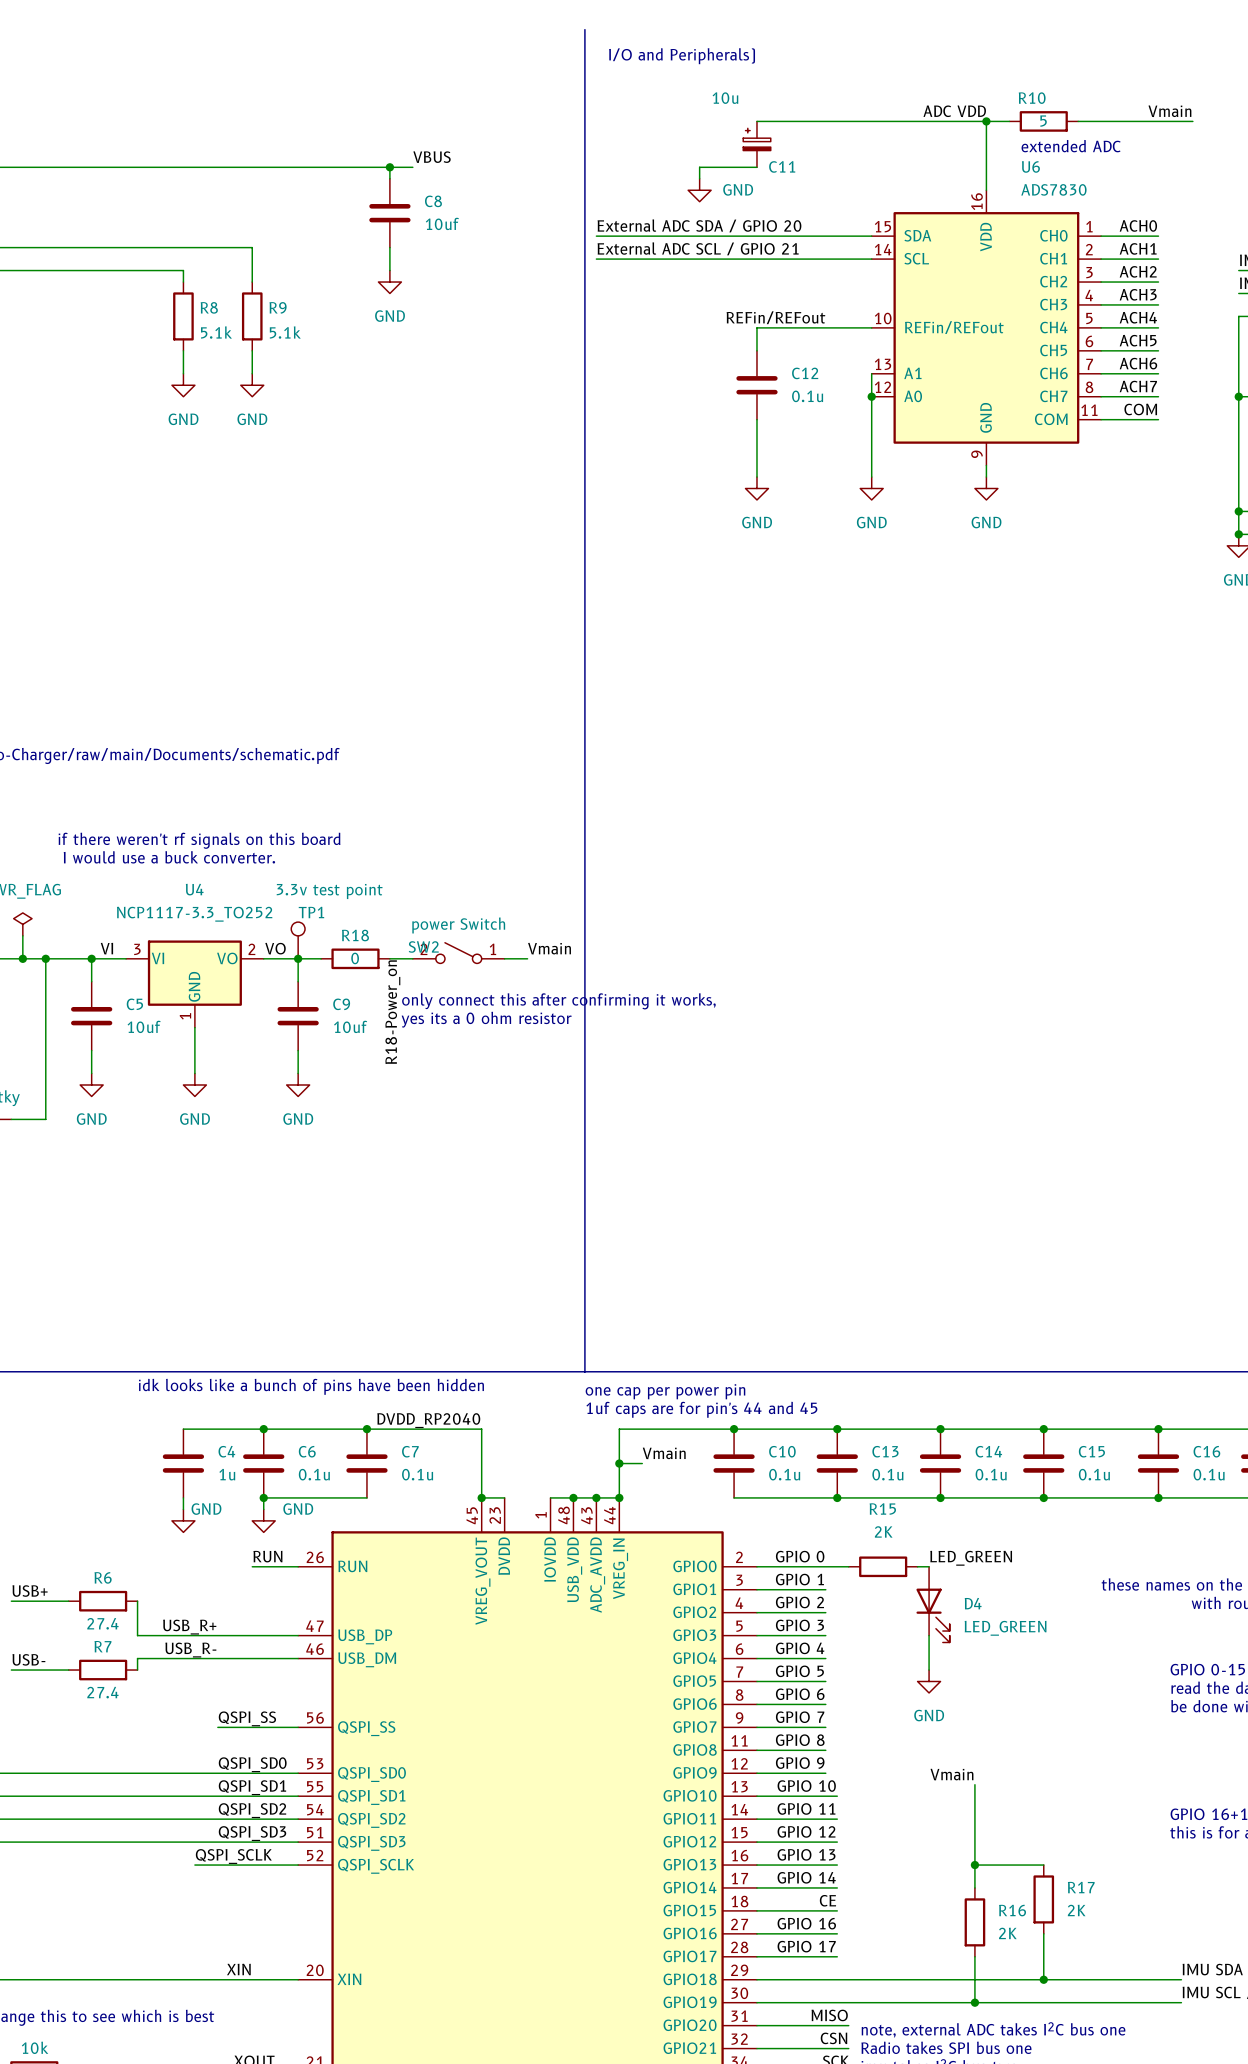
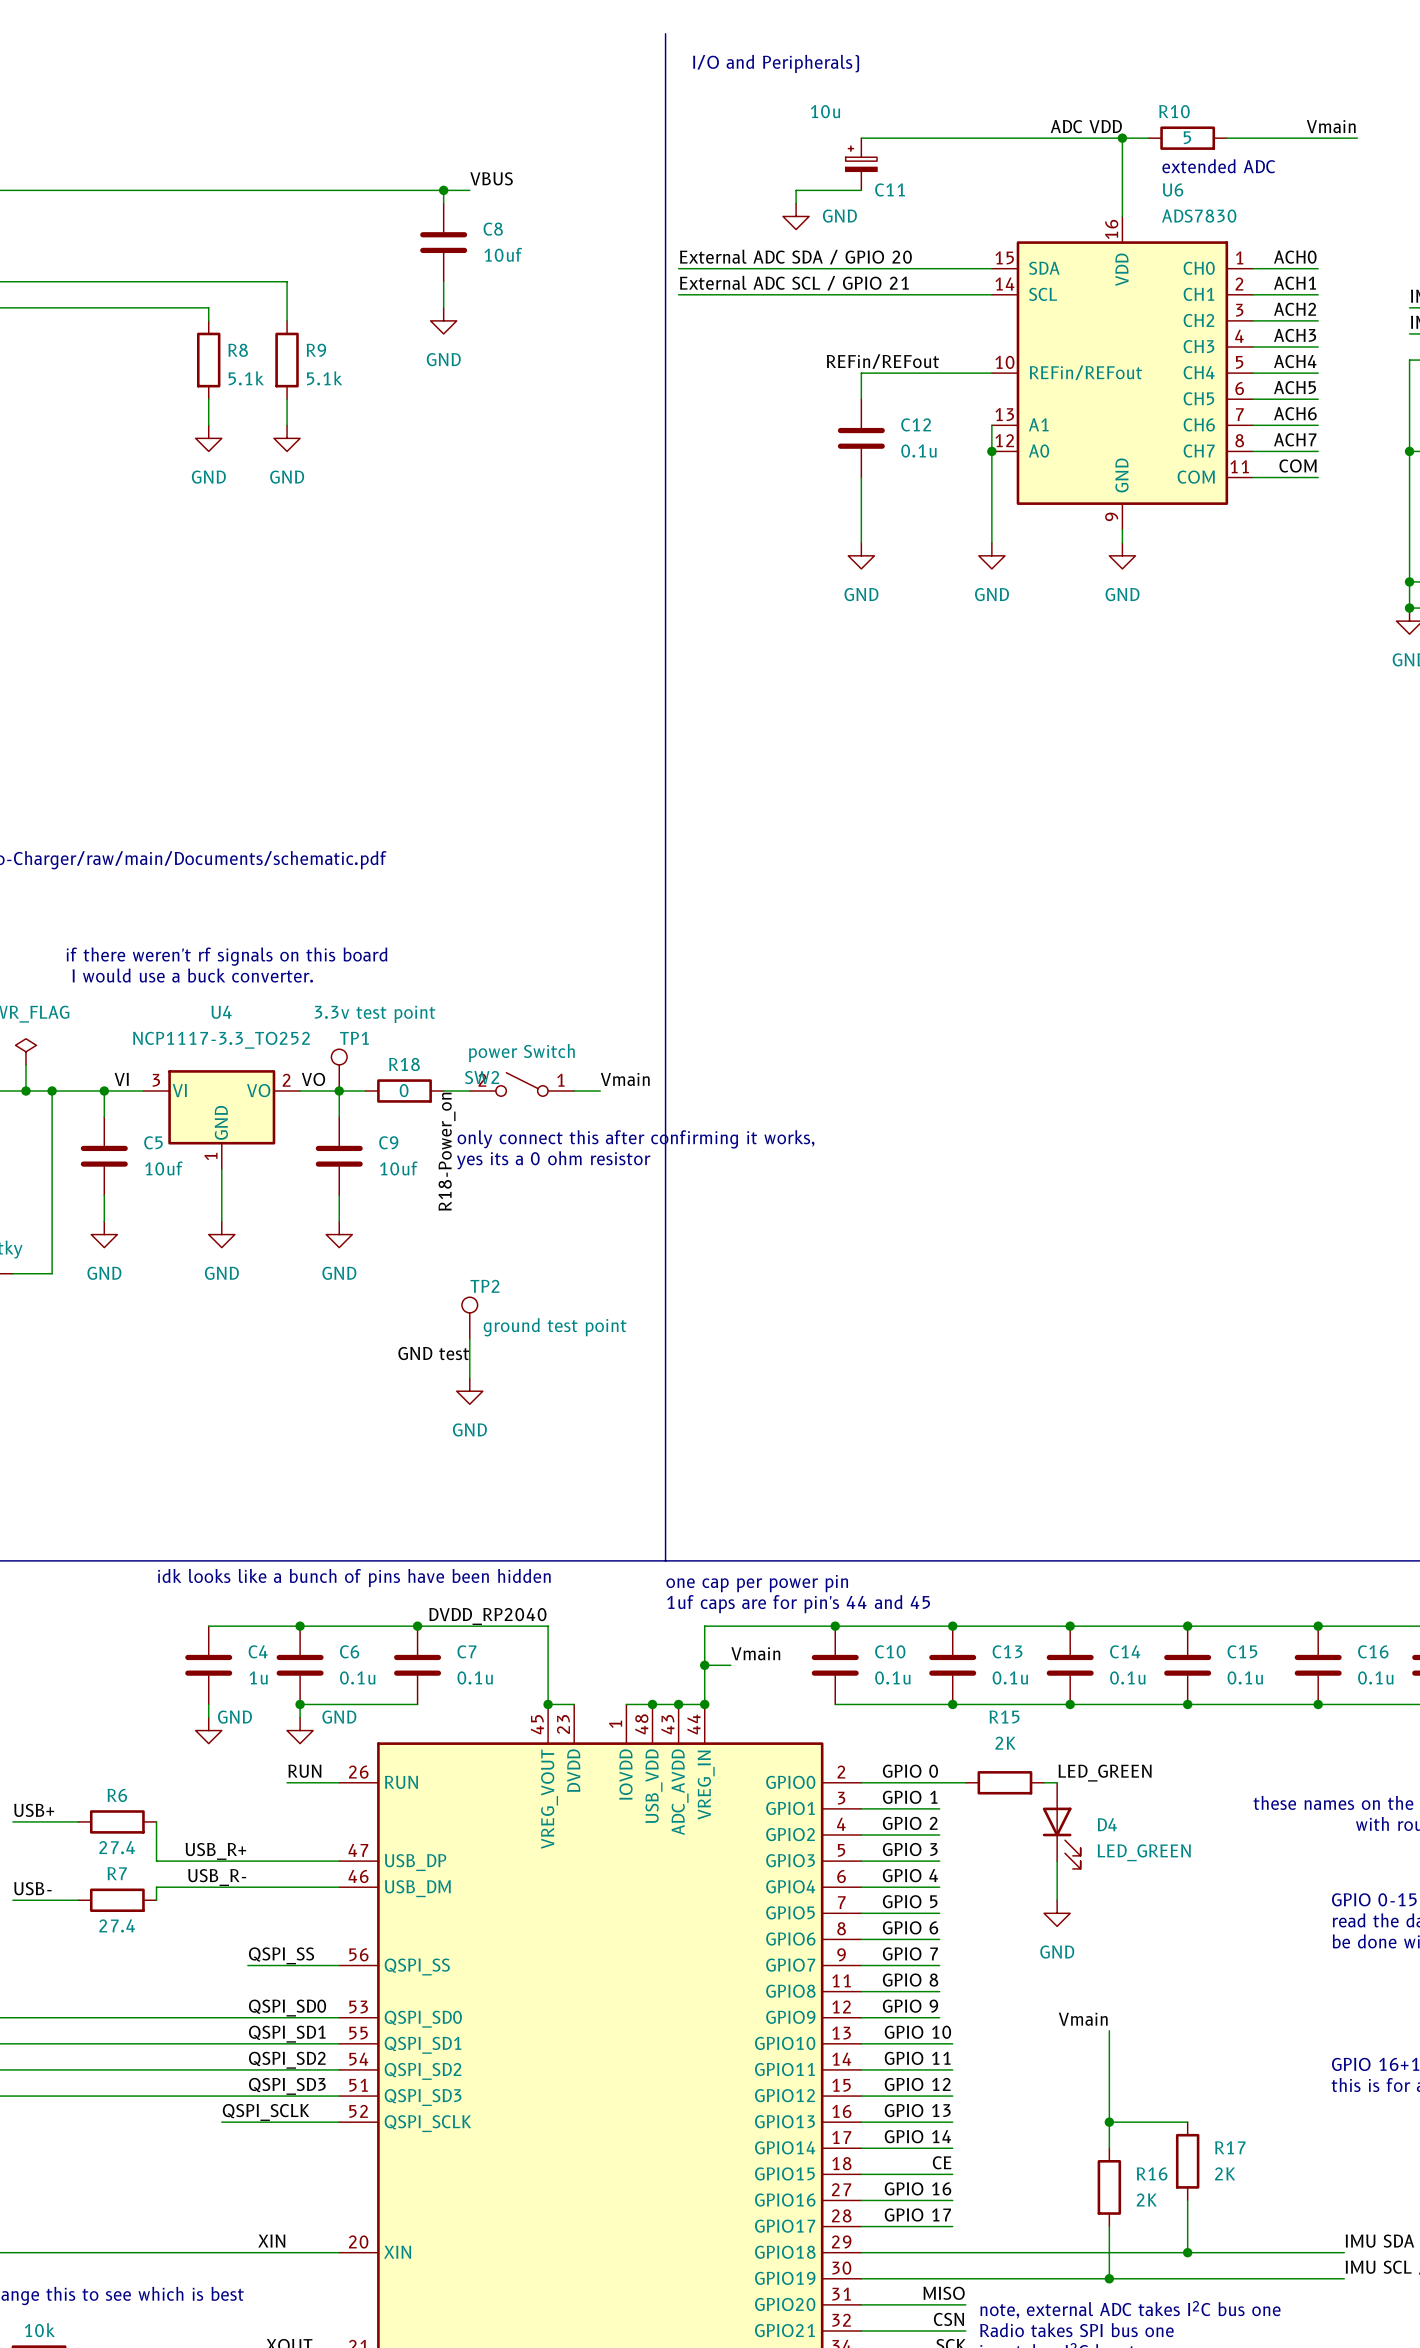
TP2: none -> ground test point (469, 1318)
wire: none -> (469, 1339) (469, 1378)
label: none -> GND test (433, 1353)
power symbol: none -> GND (469, 1391)

